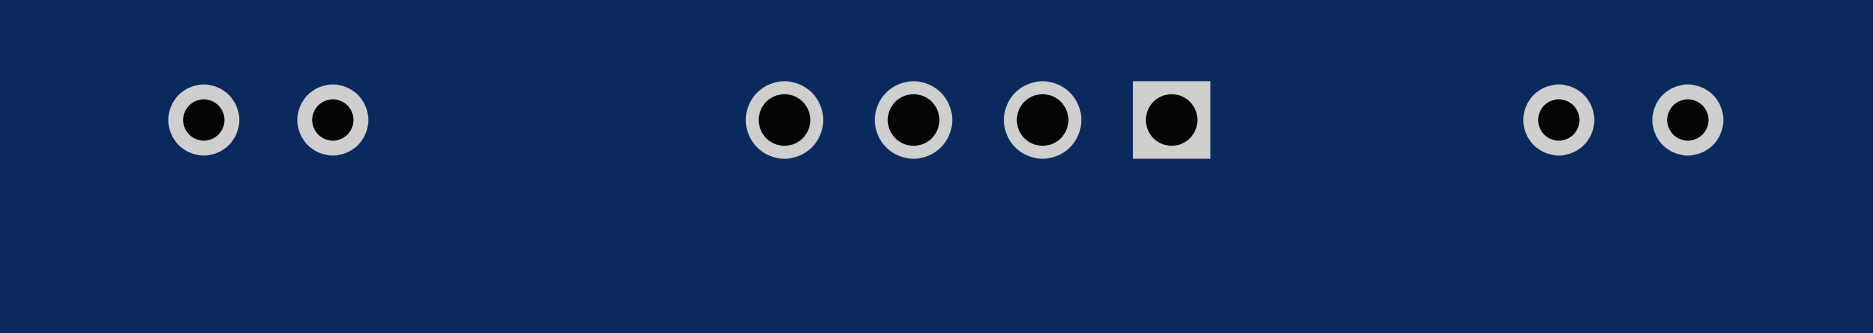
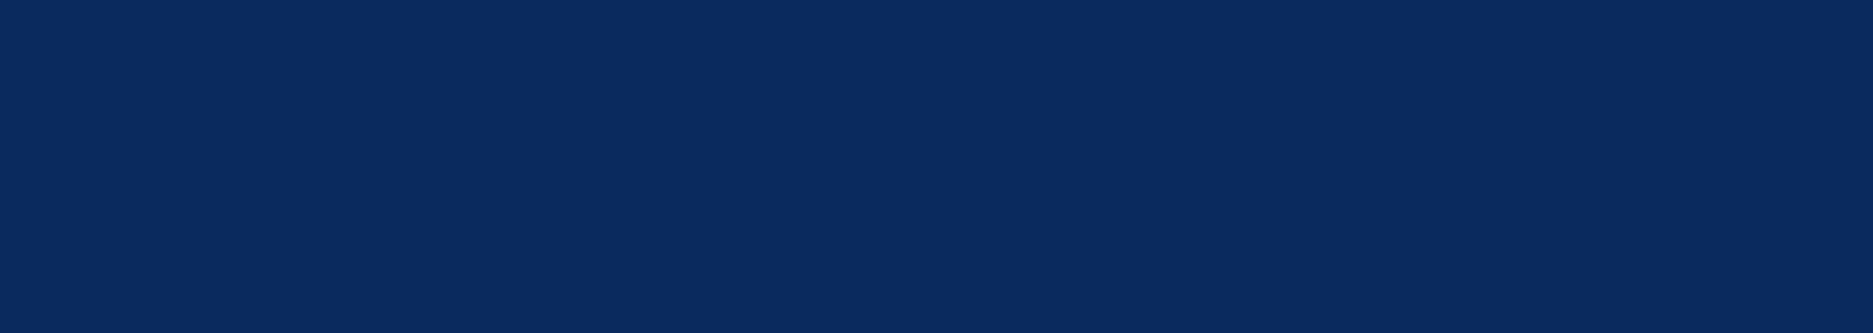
part: (268, 119) -> none
part: (978, 119) -> none
part: (1623, 119) -> none

